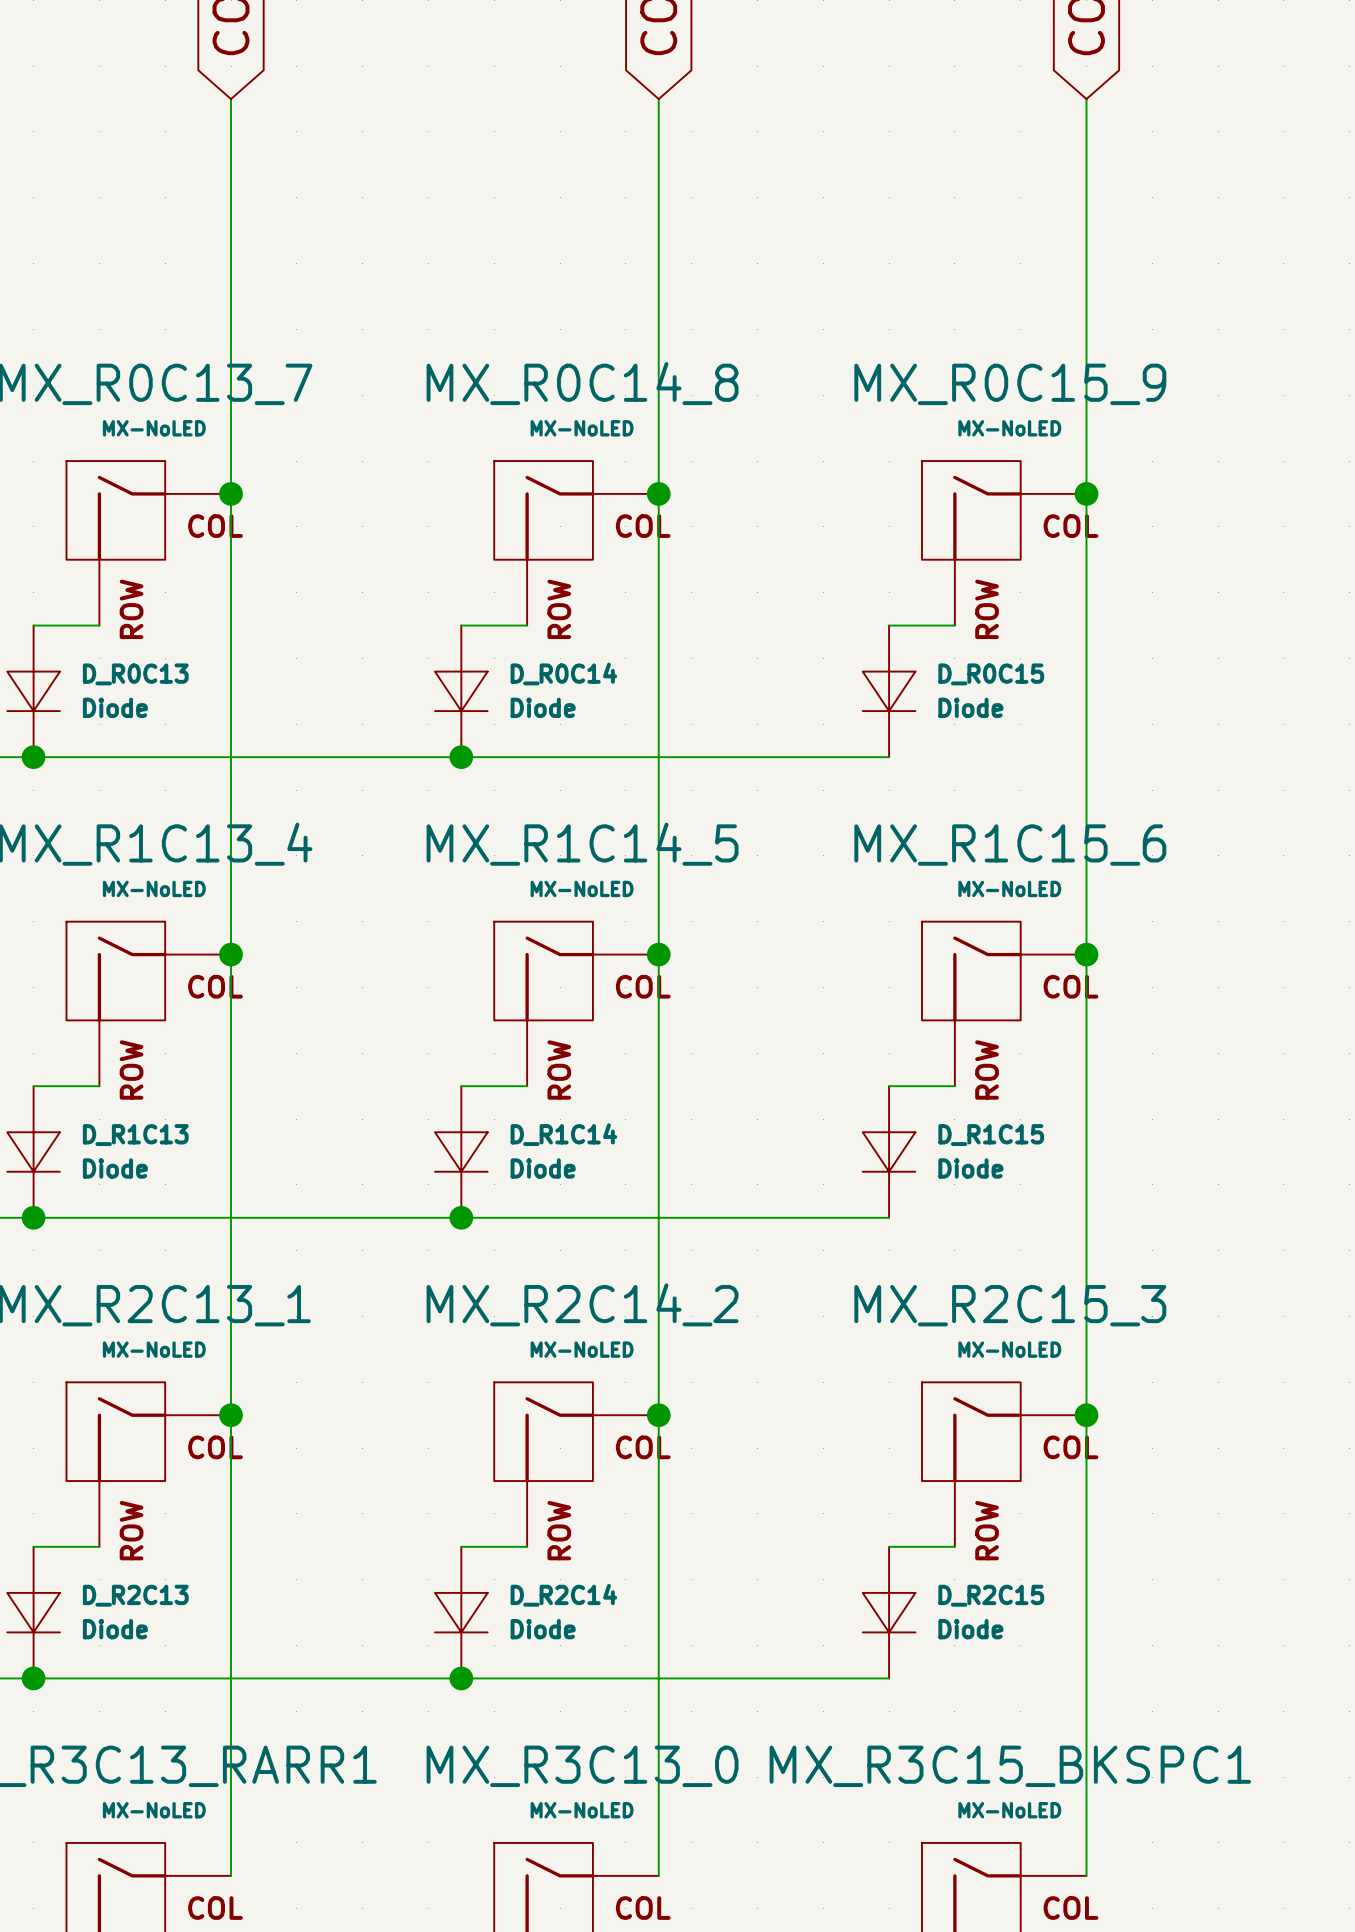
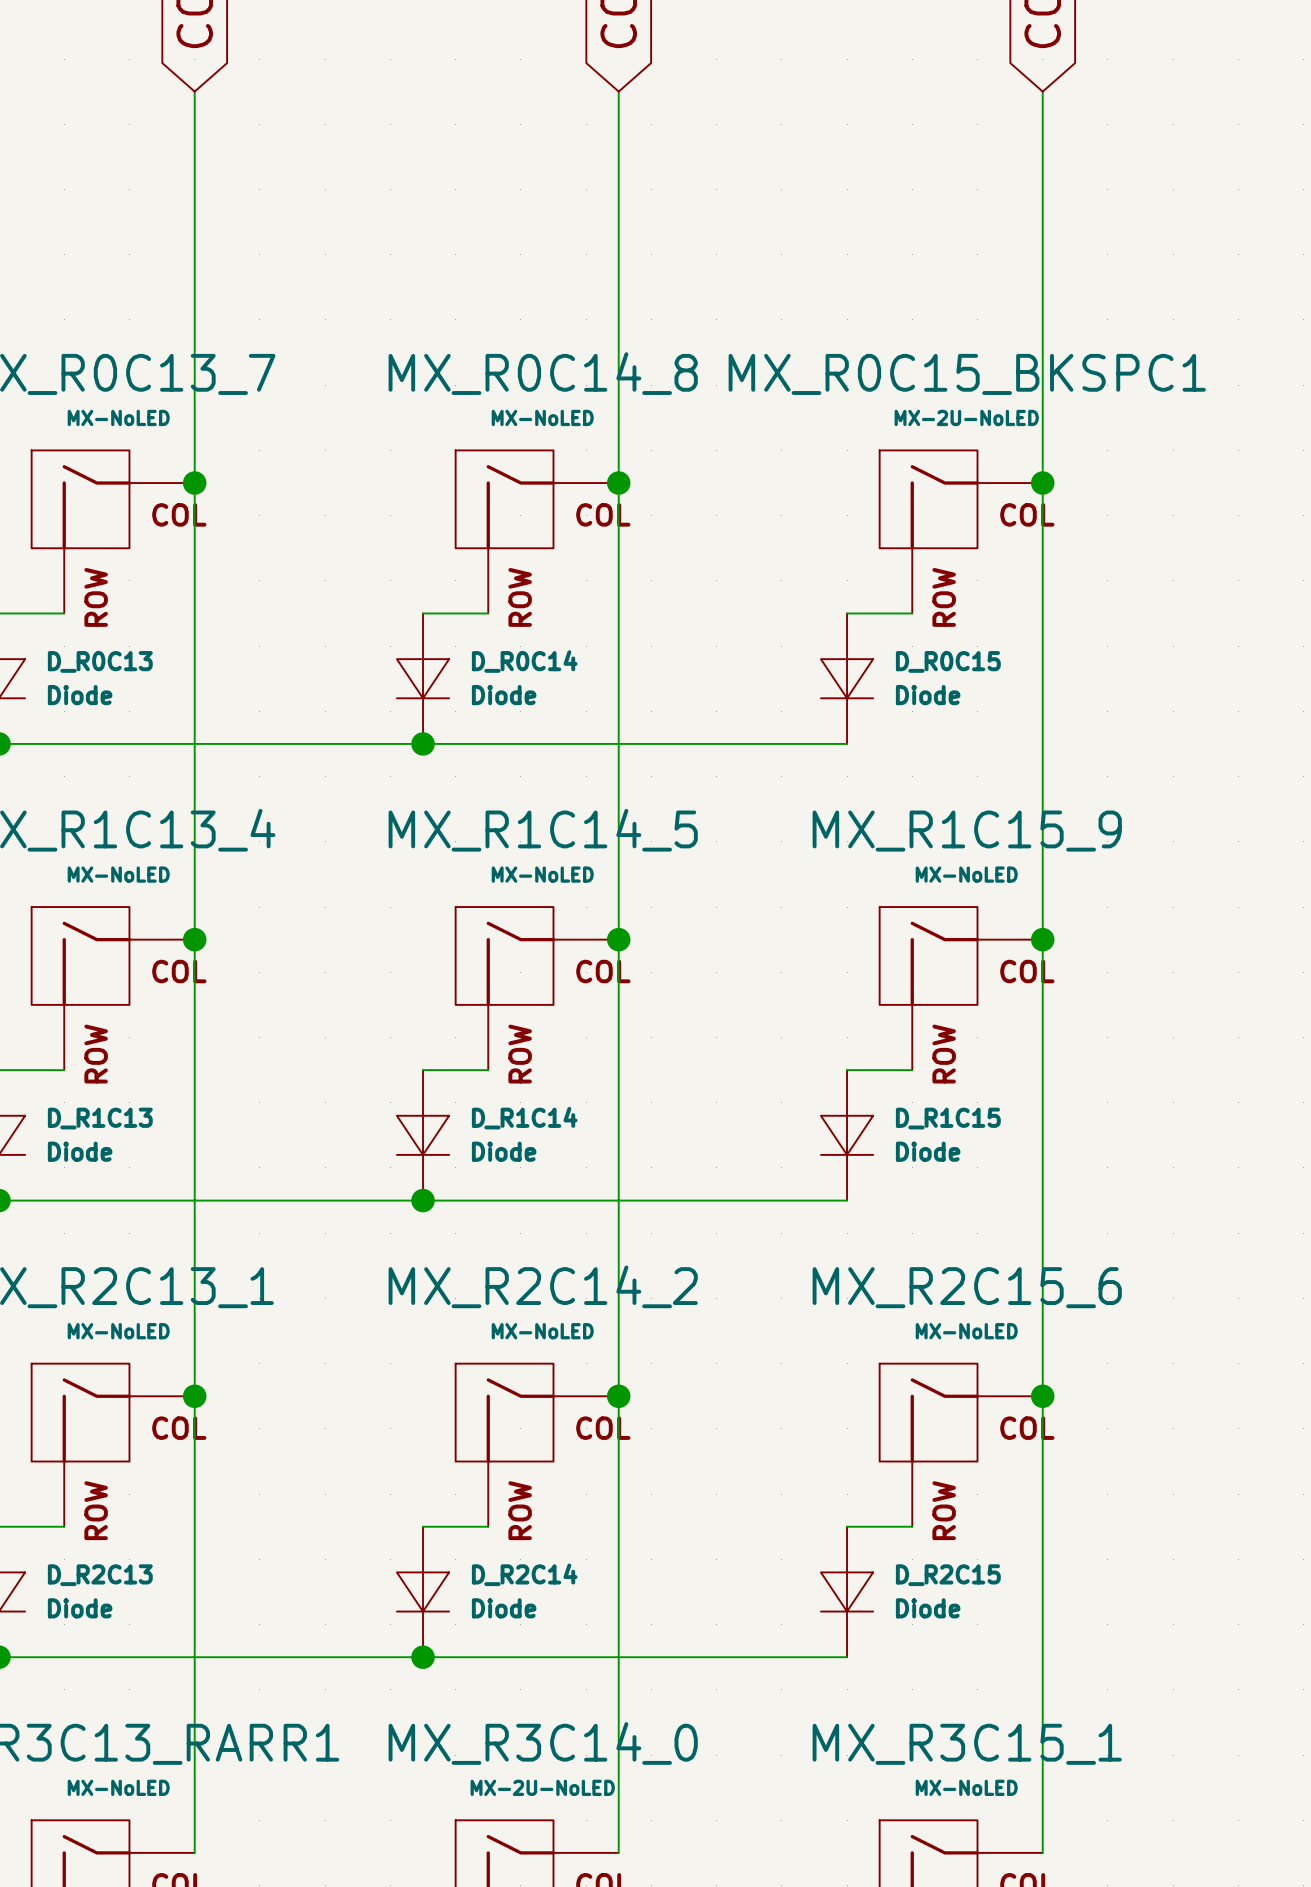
MX_R0C15_9 name: MX_R0C15_9 (1010, 384) -> MX_R0C15_BKSPC1 (967, 374)
MX_R0C15_9 value: MX-NoLED (1009, 428) -> MX-2U-NoLED (966, 417)
MX_R1C15_6 name: MX_R1C15_6 (1010, 845) -> MX_R1C15_9 (967, 831)
MX_R2C15_3 name: MX_R2C15_3 (1010, 1305) -> MX_R2C15_6 (967, 1287)
MX_R3C13_0 name: MX_R3C13_0 (582, 1766) -> MX_R3C14_0 (543, 1743)
MX_R3C15_BKSPC1 name: MX_R3C15_BKSPC1 (1010, 1766) -> MX_R3C15_1 (967, 1744)
MX_R3C13_0 value: MX-NoLED (582, 1810) -> MX-2U-NoLED (542, 1787)

